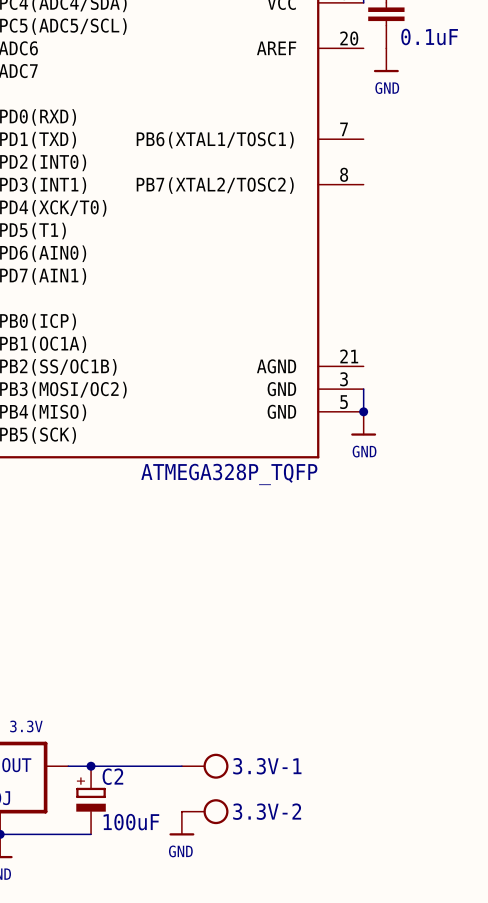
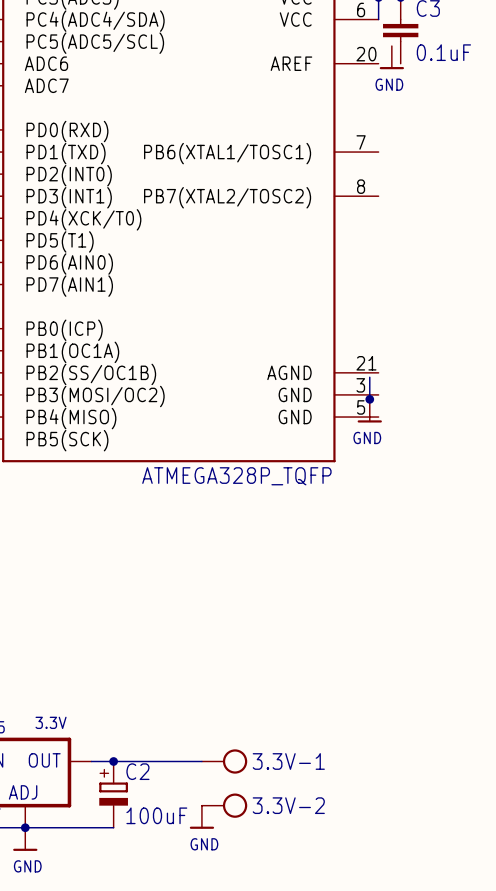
power symbol position: GND (386, 60) -> GND (391, 57)
wire: (363, 389) (363, 411) -> (369, 377) (369, 399)
junction position: (363, 411) -> (369, 399)
power symbol position: GND (363, 423) -> GND (369, 410)

